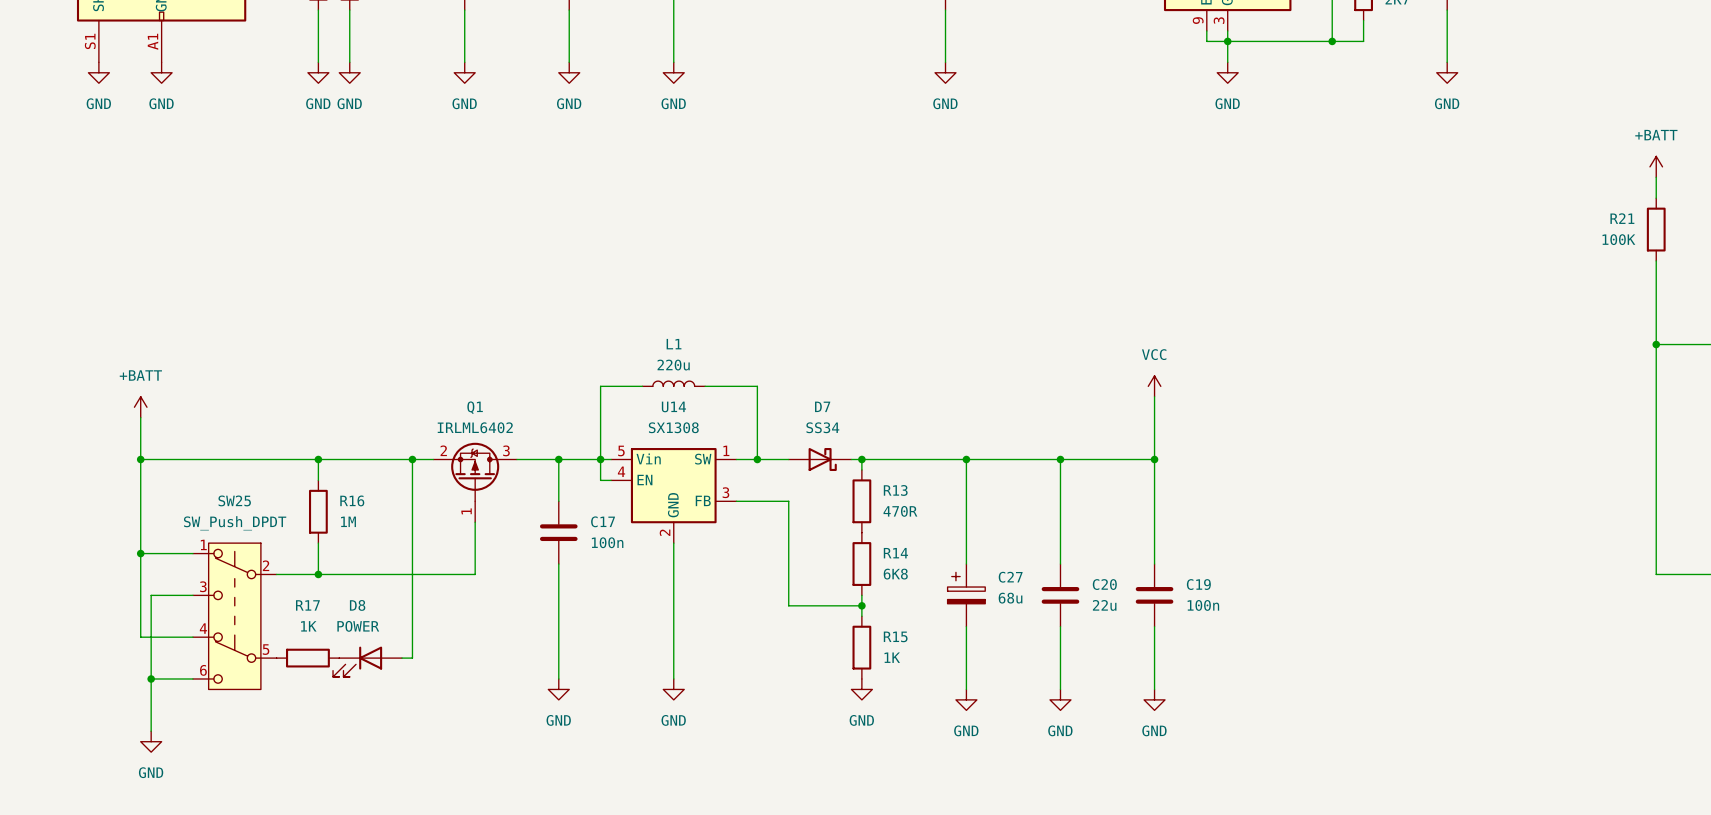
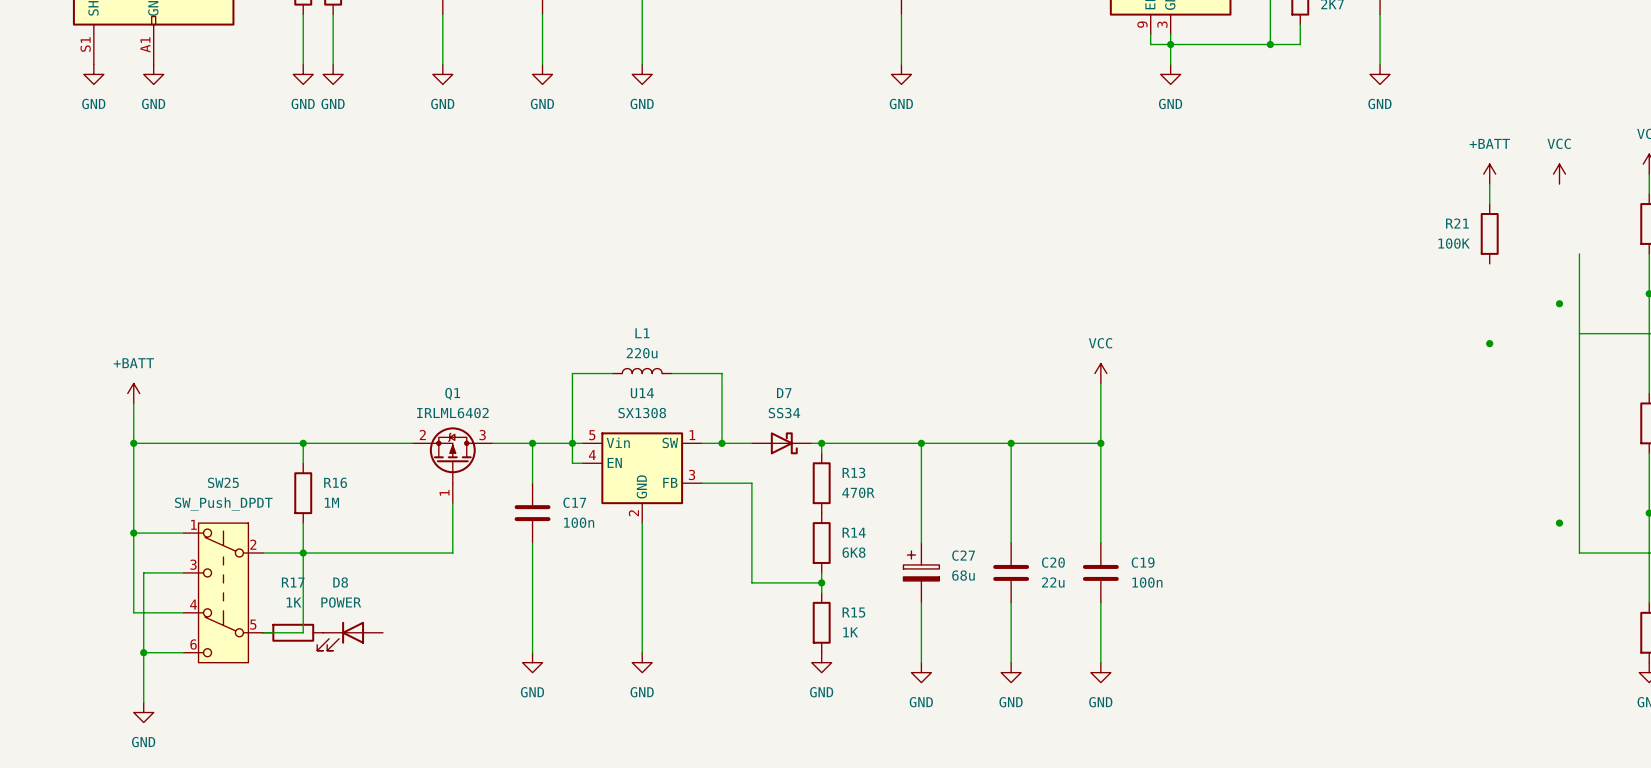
power symbol position: +BATT (1656, 166) -> +BATT (1489, 174)
power symbol: none -> VCC (1559, 174)
wire: (1656, 177) (1656, 198) -> (1489, 184) (1489, 204)
R21 position: (1656, 229) -> (1489, 233)
junction position: (1656, 344) -> (1559, 303)
junction: none -> (1489, 343)
wire: (412, 459) (412, 658) (402, 658) -> none
junction: (412, 459) -> none
junction: none -> (1559, 523)
wire: none -> (303, 553) (303, 632) (263, 632)

